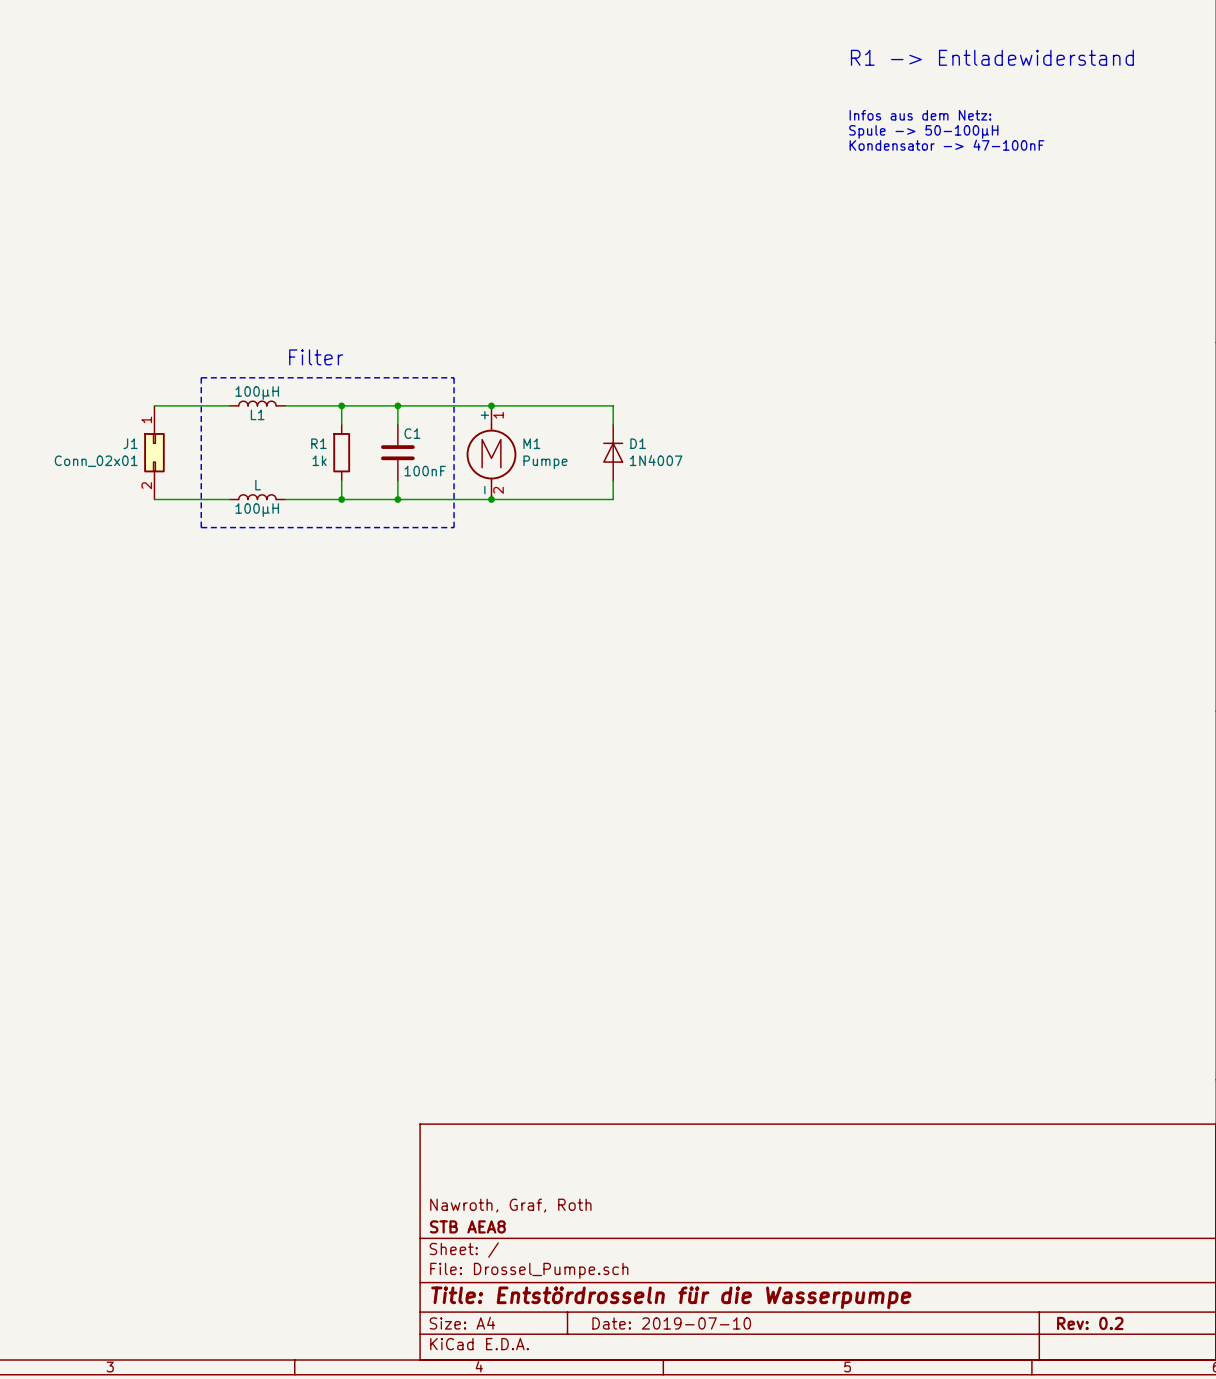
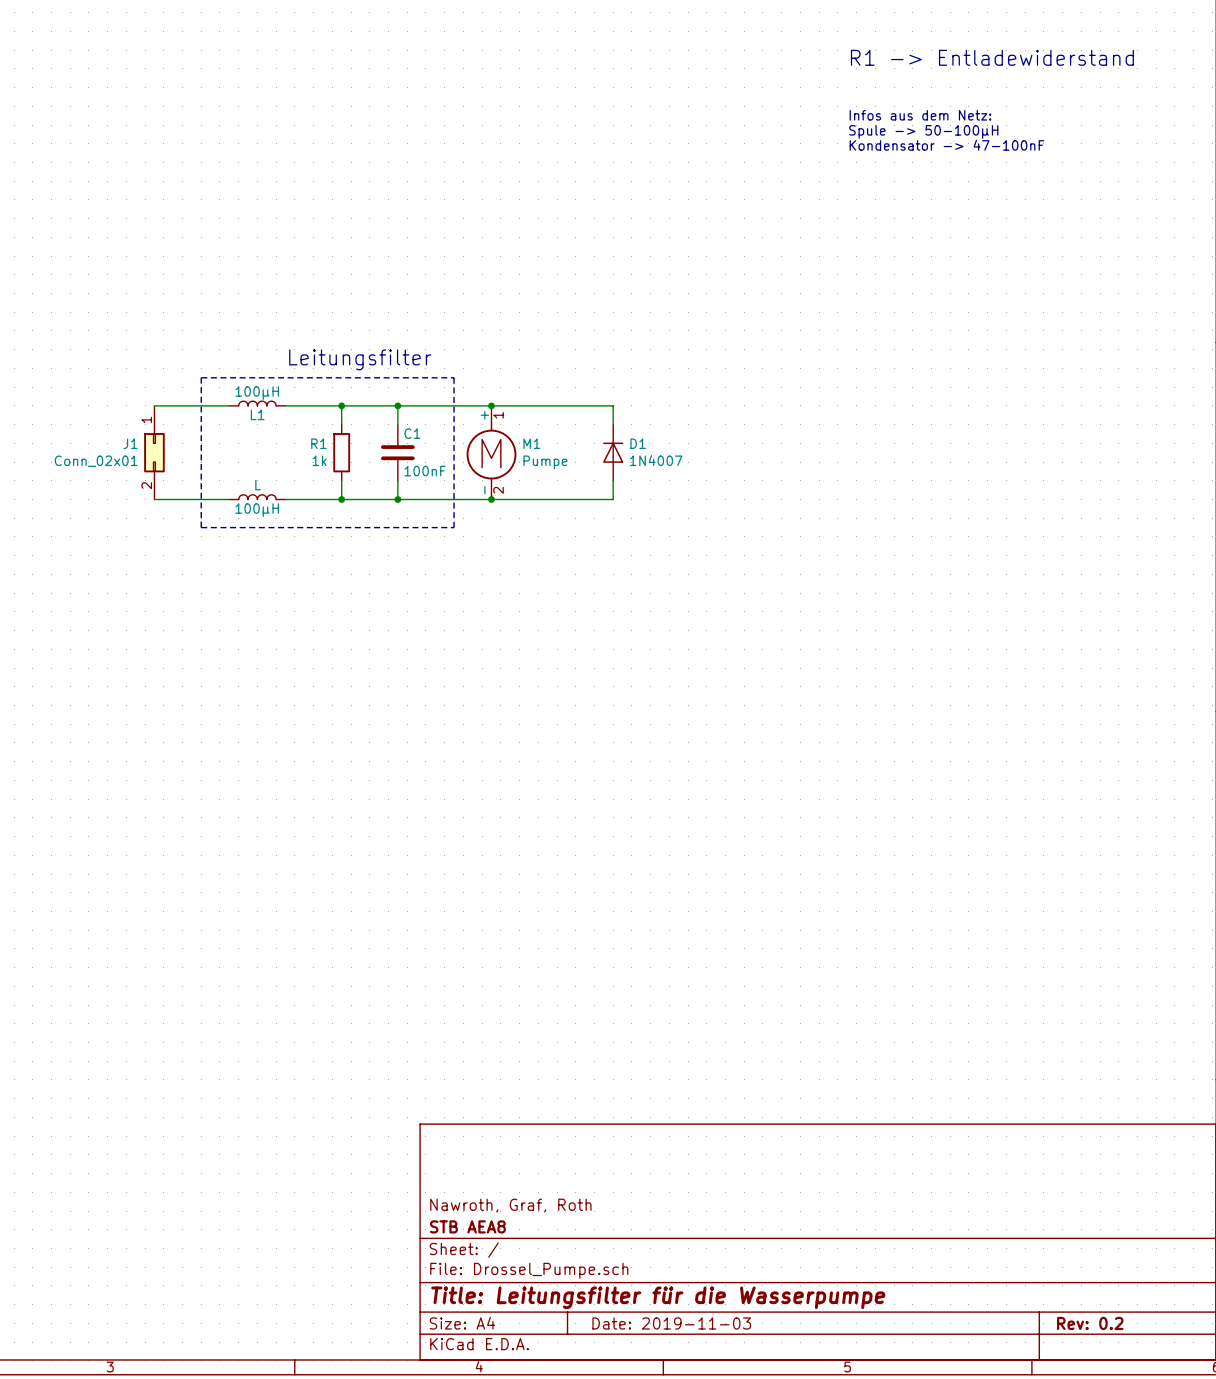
text: Filter (316, 357) -> Leitungsfilter (360, 359)
title block: Title: Entstördrosseln für die Wasserpumpe (671, 1297) -> Title: Leitungsfilter für die Wasserpumpe (658, 1297)
title block: Date: 2019-07-10 (671, 1323) -> Date: 2019-11-03 (671, 1323)

